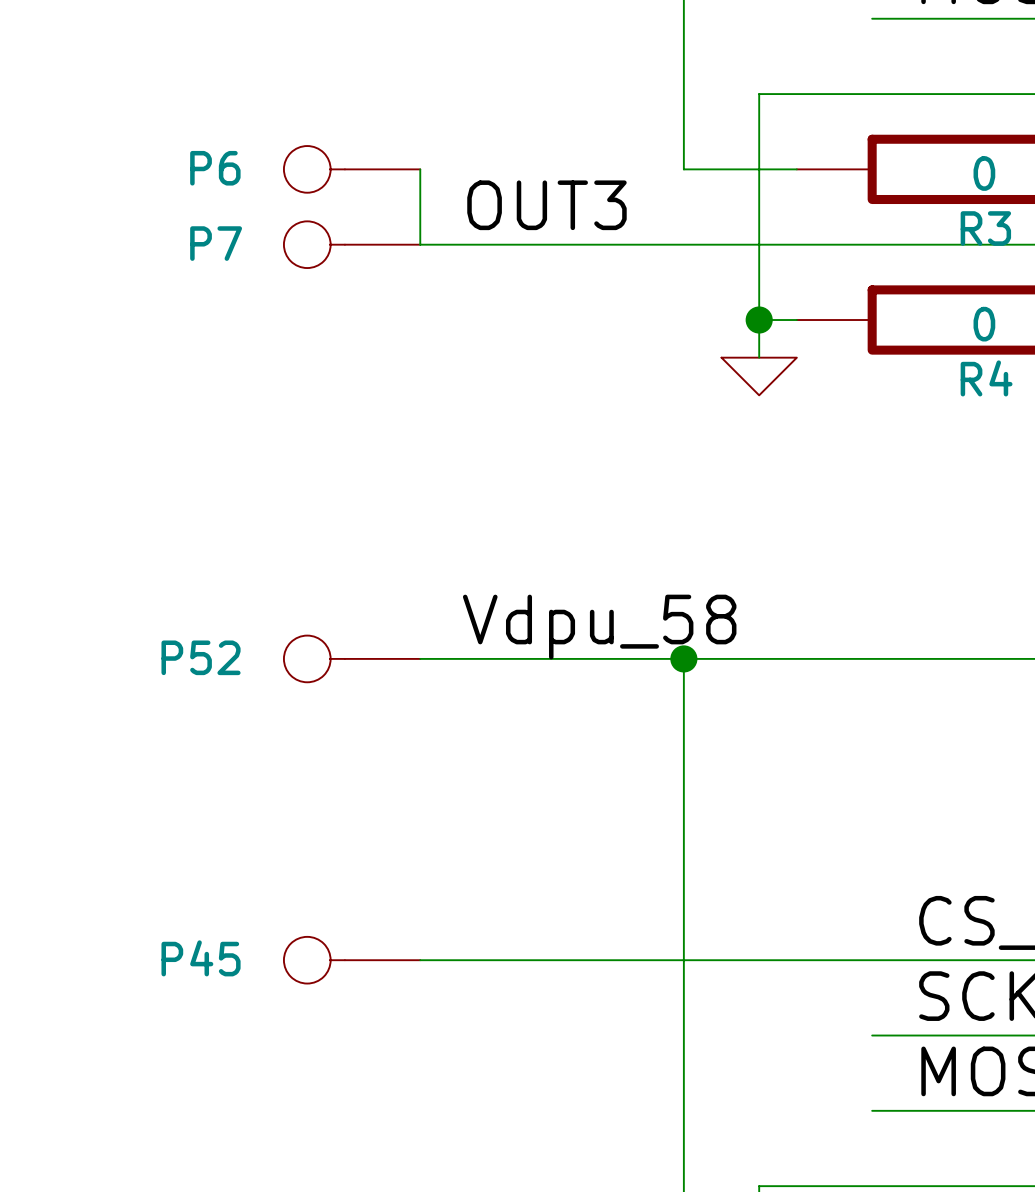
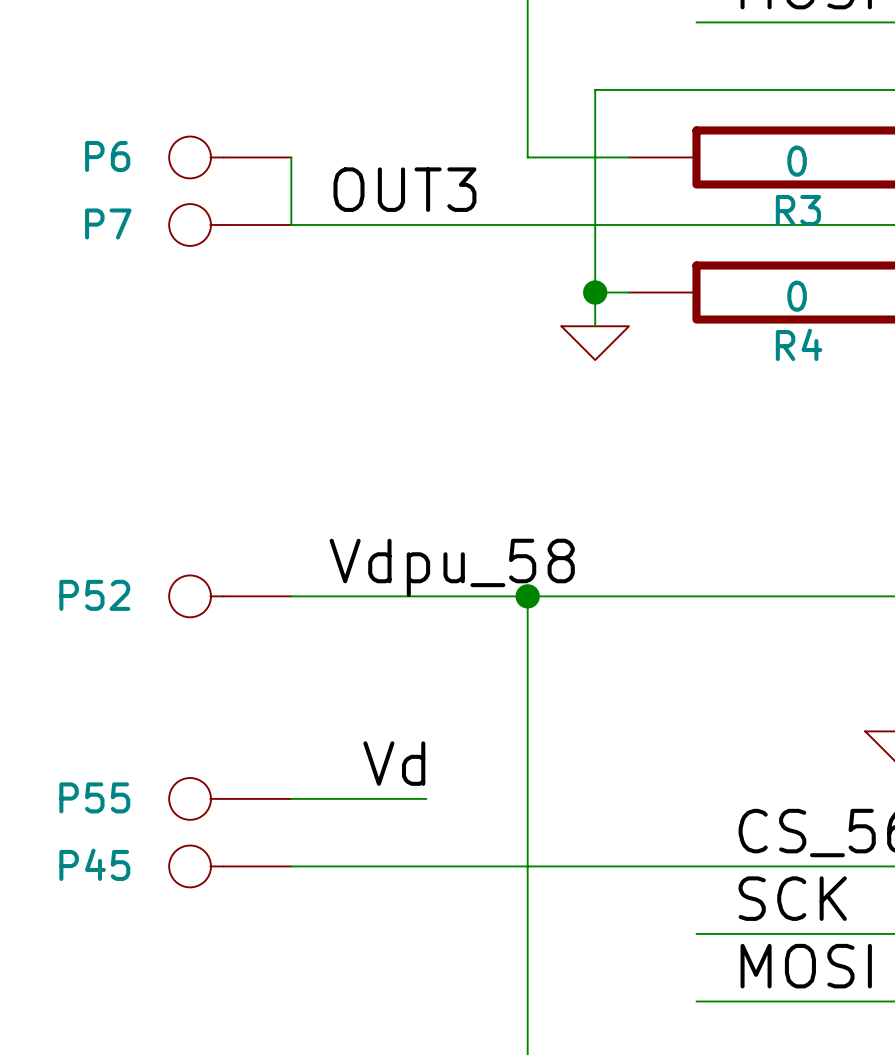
label: none -> Vd (394, 763)
P55: none -> (230, 798)
wire: none -> (291, 798) (426, 798)

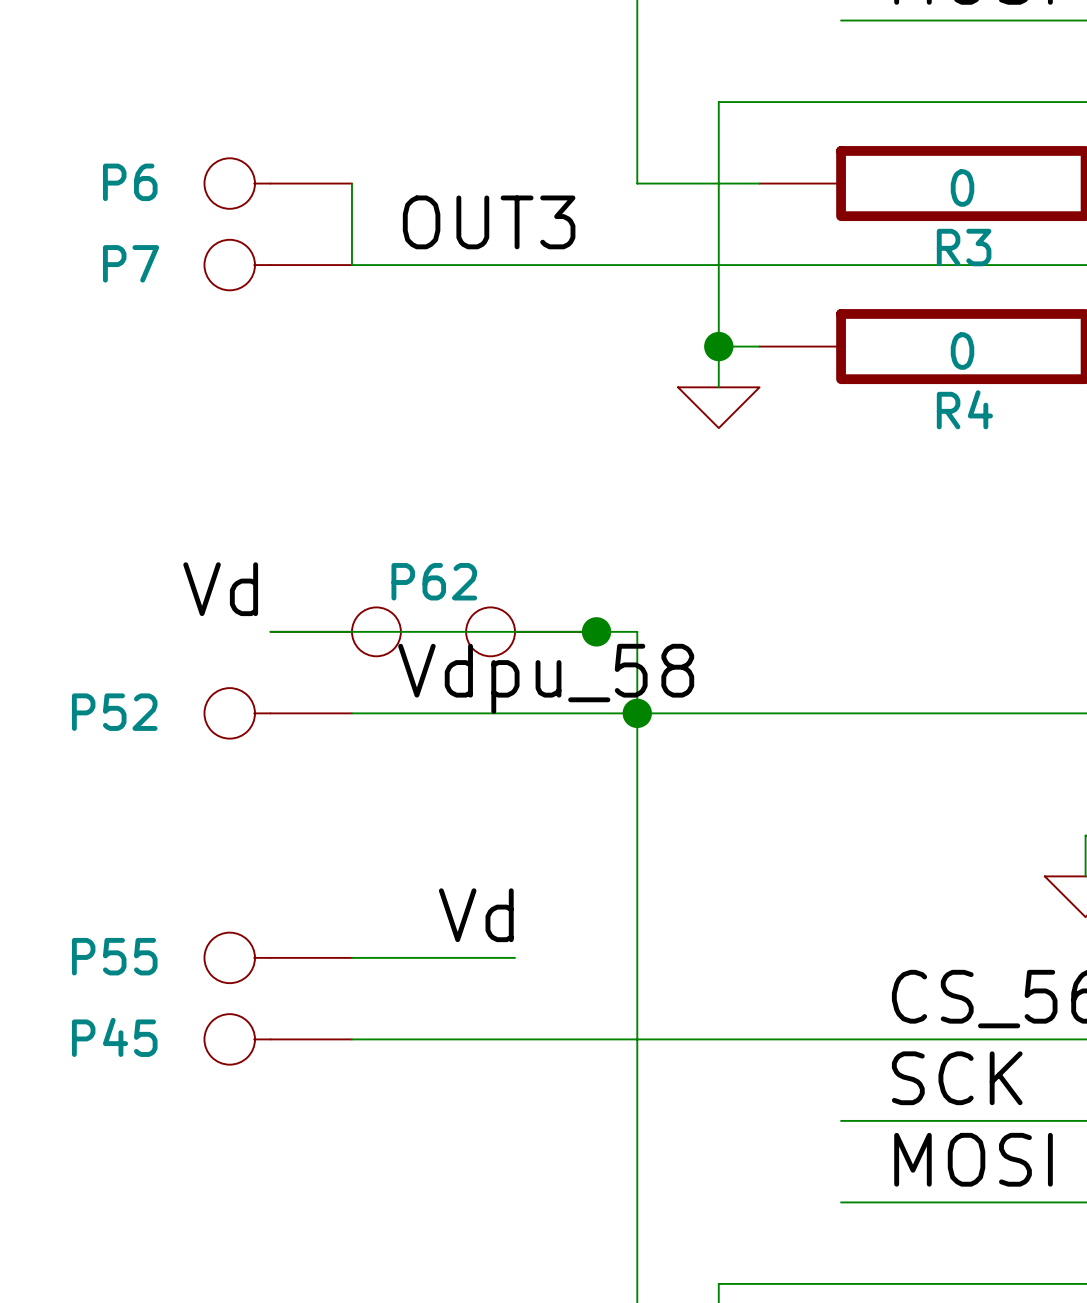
label: none -> Vd (220, 589)
wire: none -> (270, 631) (637, 631) (637, 713)
P62: none -> (433, 631)
junction: none -> (596, 631)

